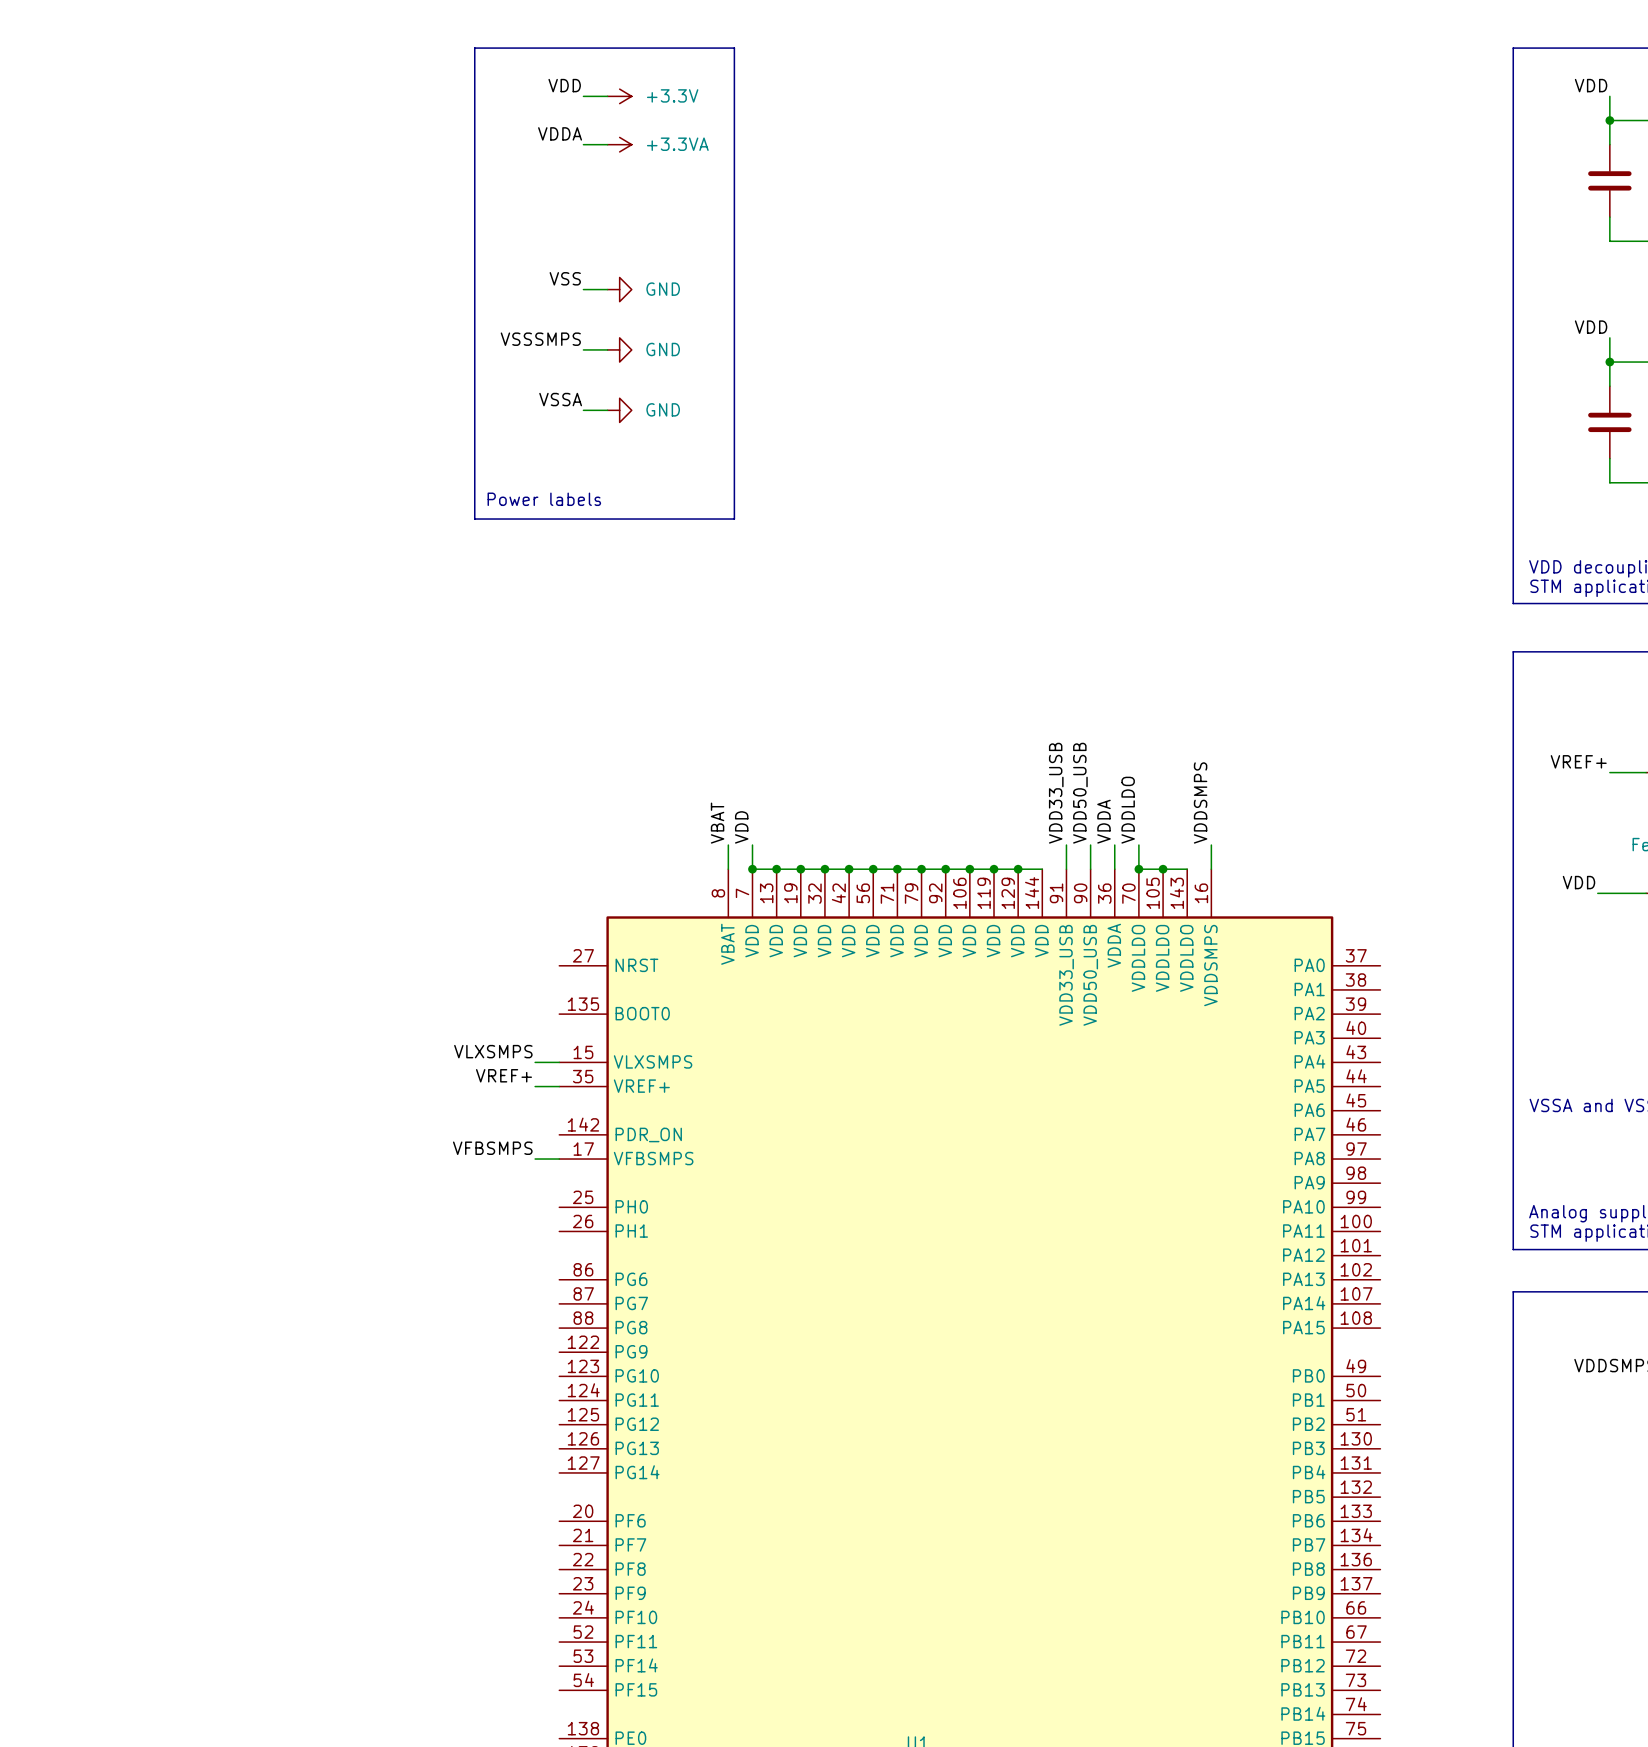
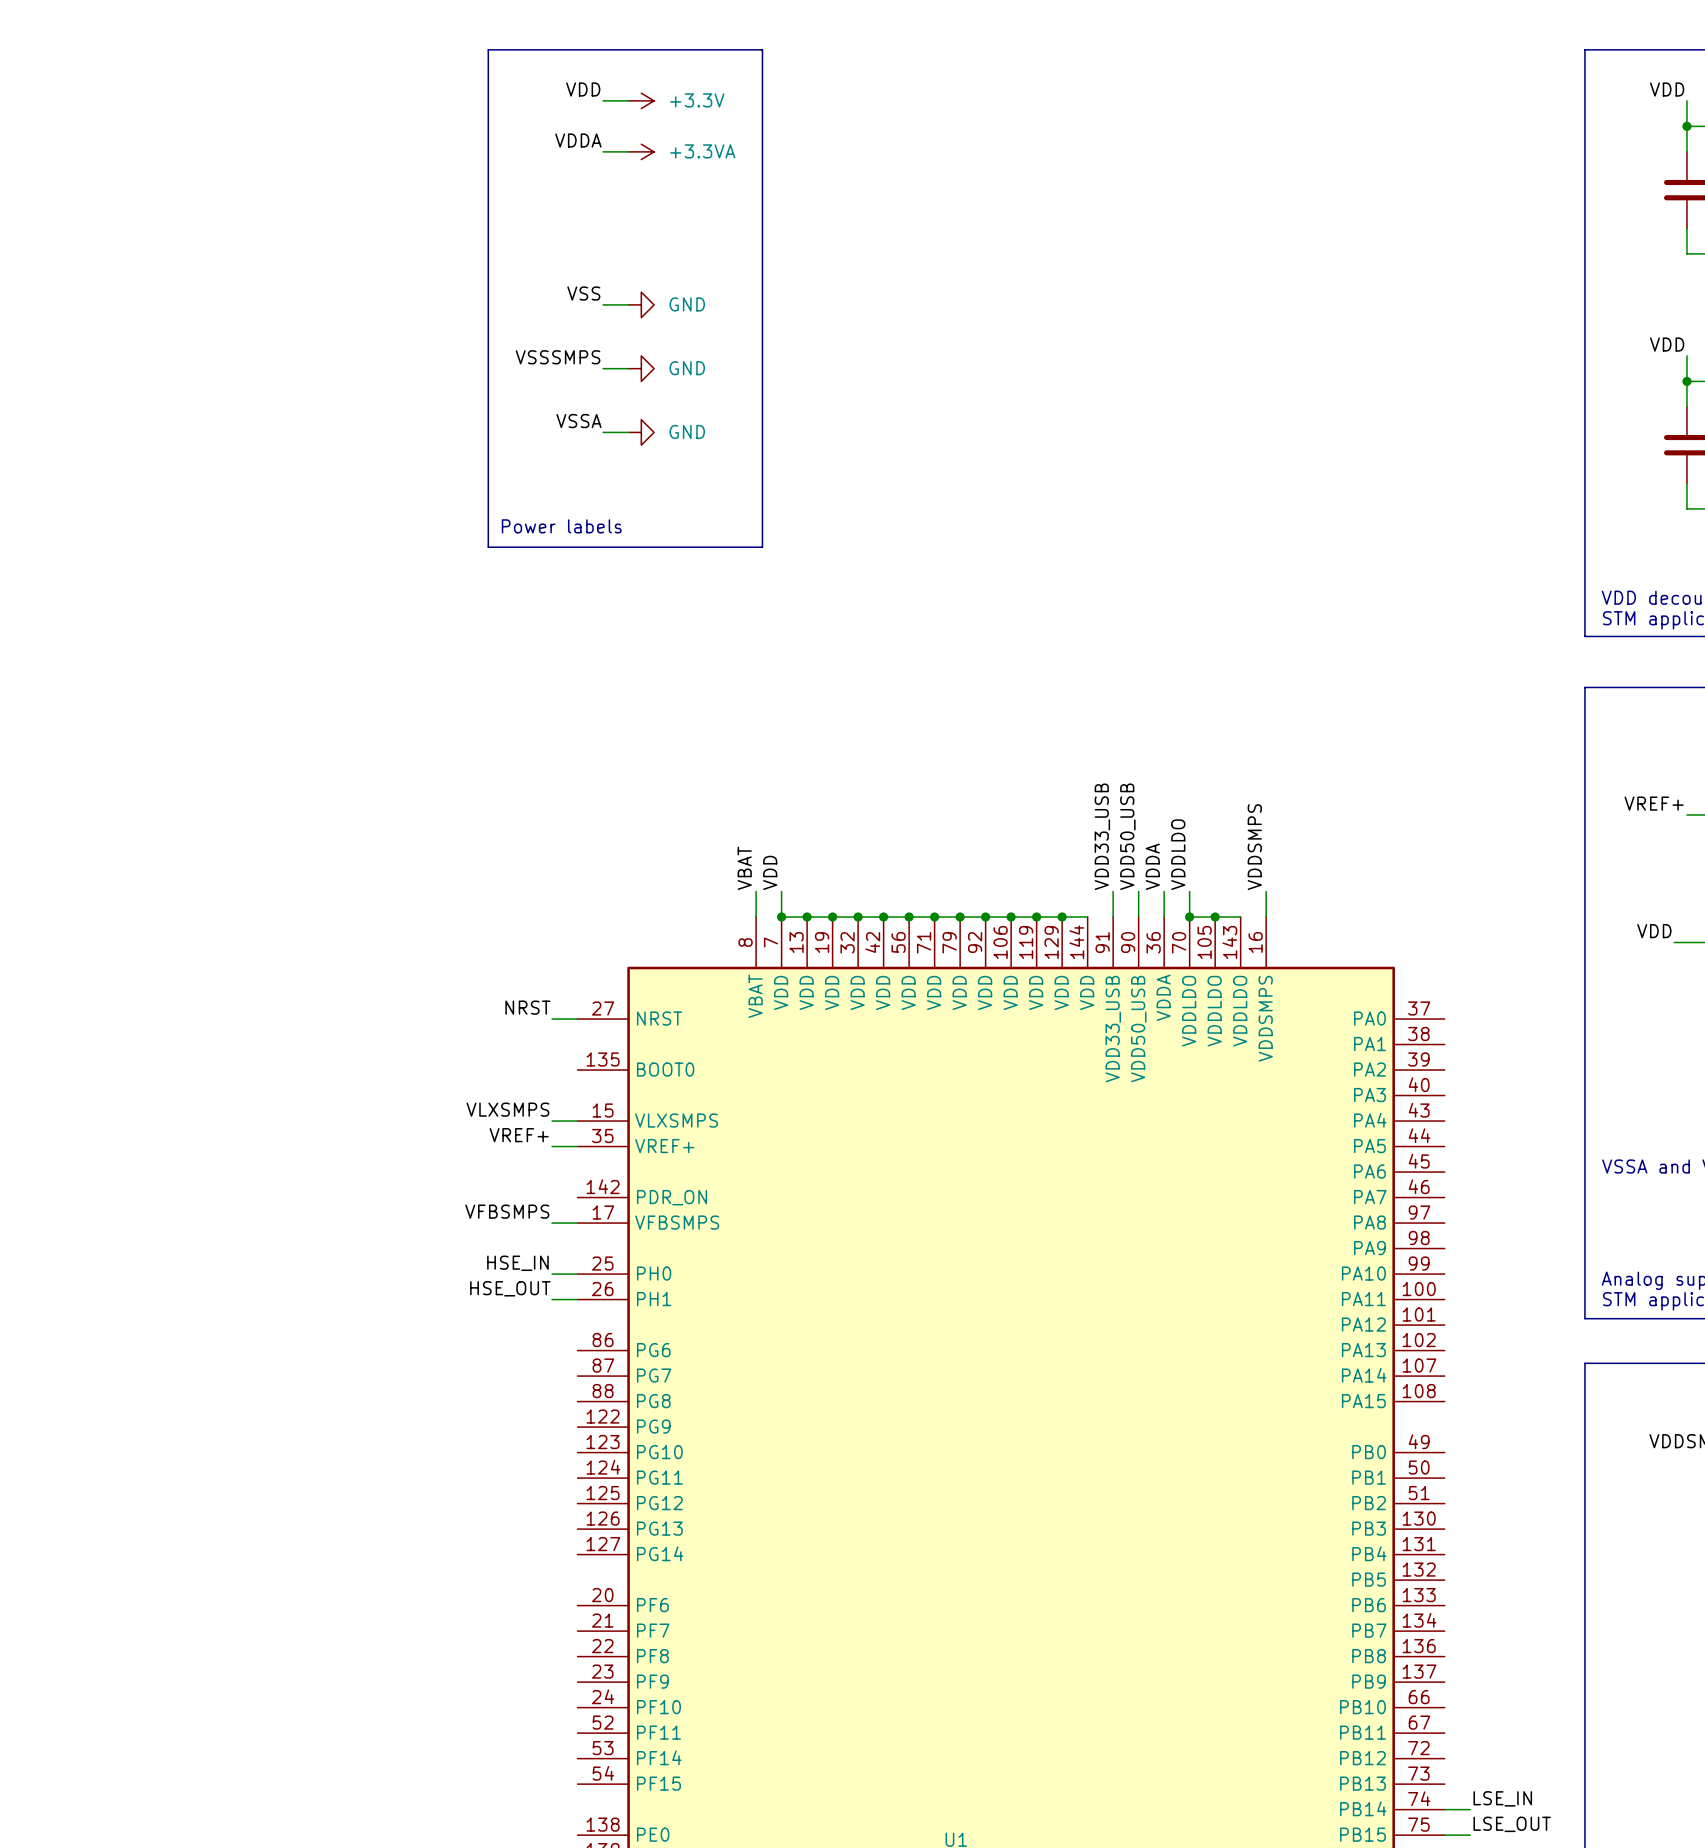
label: none -> NRST (527, 1007)
wire: none -> (552, 1019) (577, 1019)
label: none -> HSE_IN (517, 1263)
wire: none -> (552, 1274) (577, 1274)
label: none -> HSE_OUT (510, 1288)
wire: none -> (552, 1299) (577, 1299)
label: none -> LSE_IN (1502, 1798)
wire: none -> (1444, 1809) (1470, 1809)
label: none -> LSE_OUT (1512, 1824)
wire: none -> (1444, 1835) (1470, 1835)

